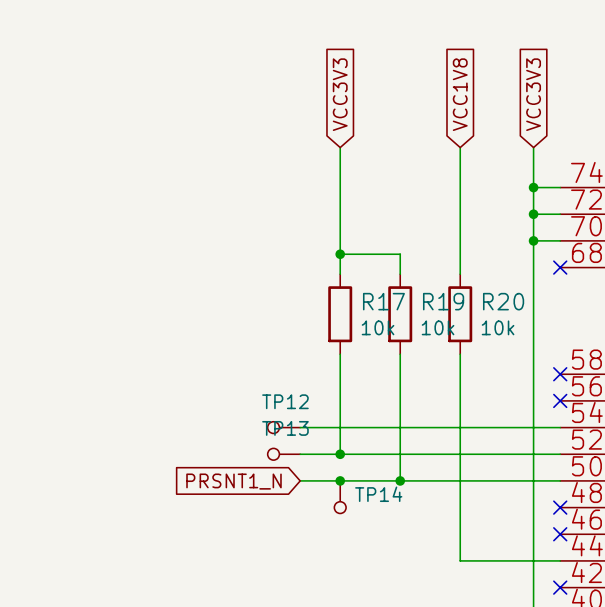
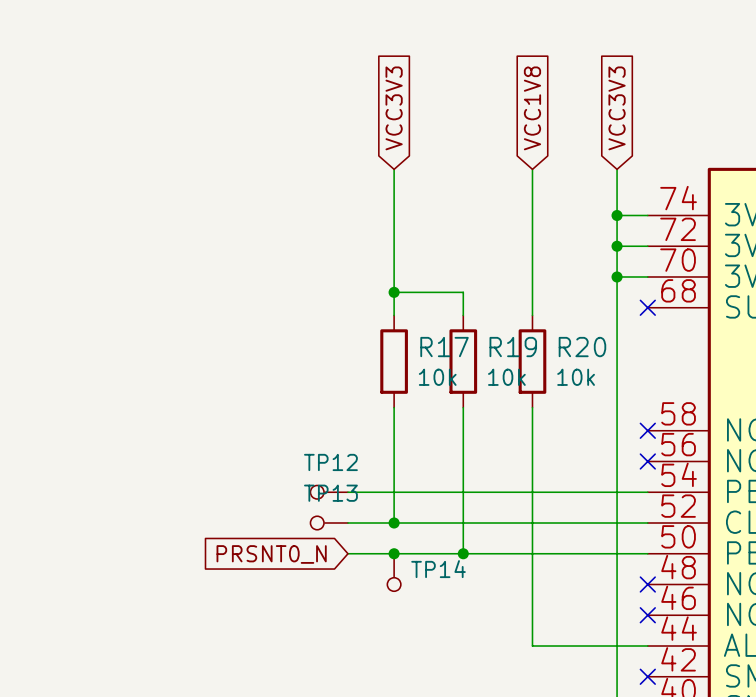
global label: PRSNT1_N (233, 481) -> PRSNT0_N (271, 554)

